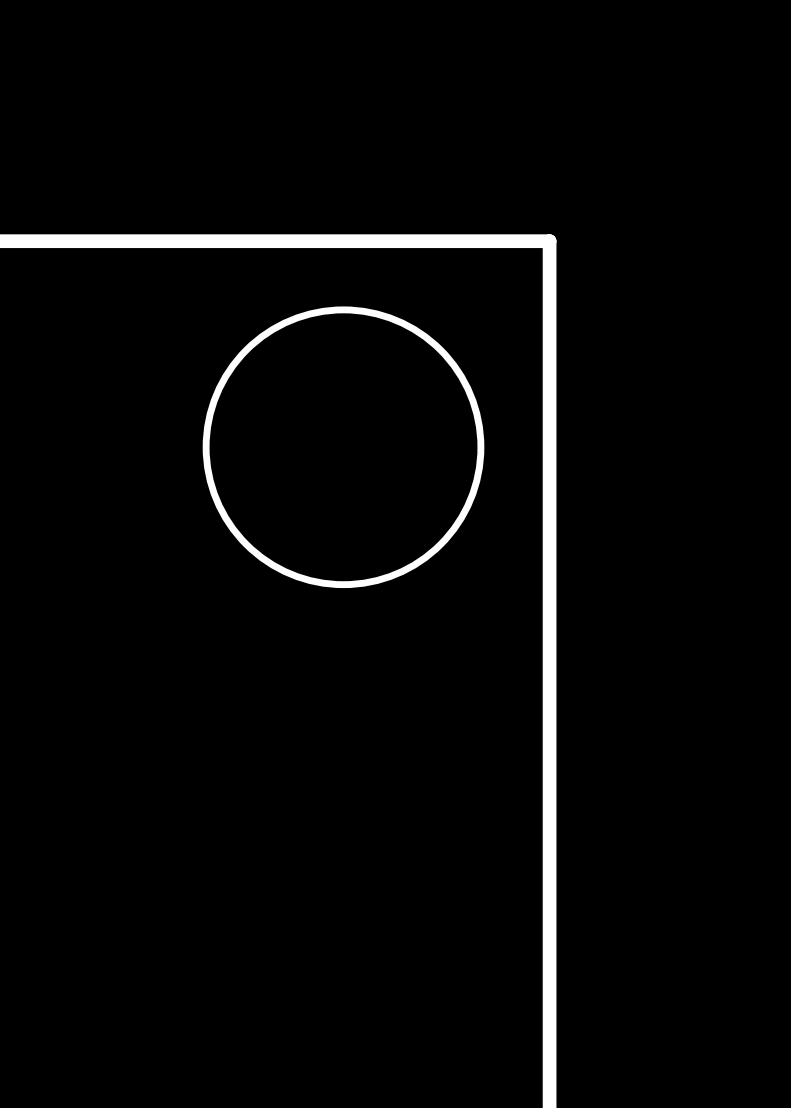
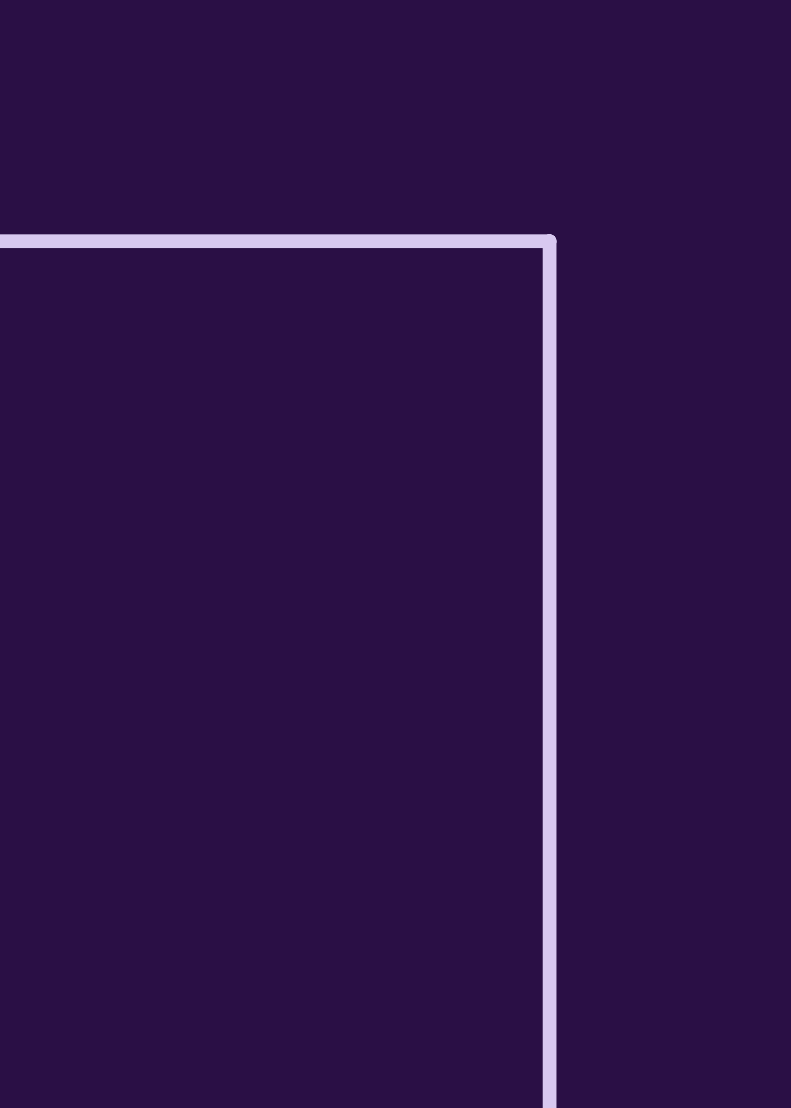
round board edge: [202, 306, 485, 589] -> none

